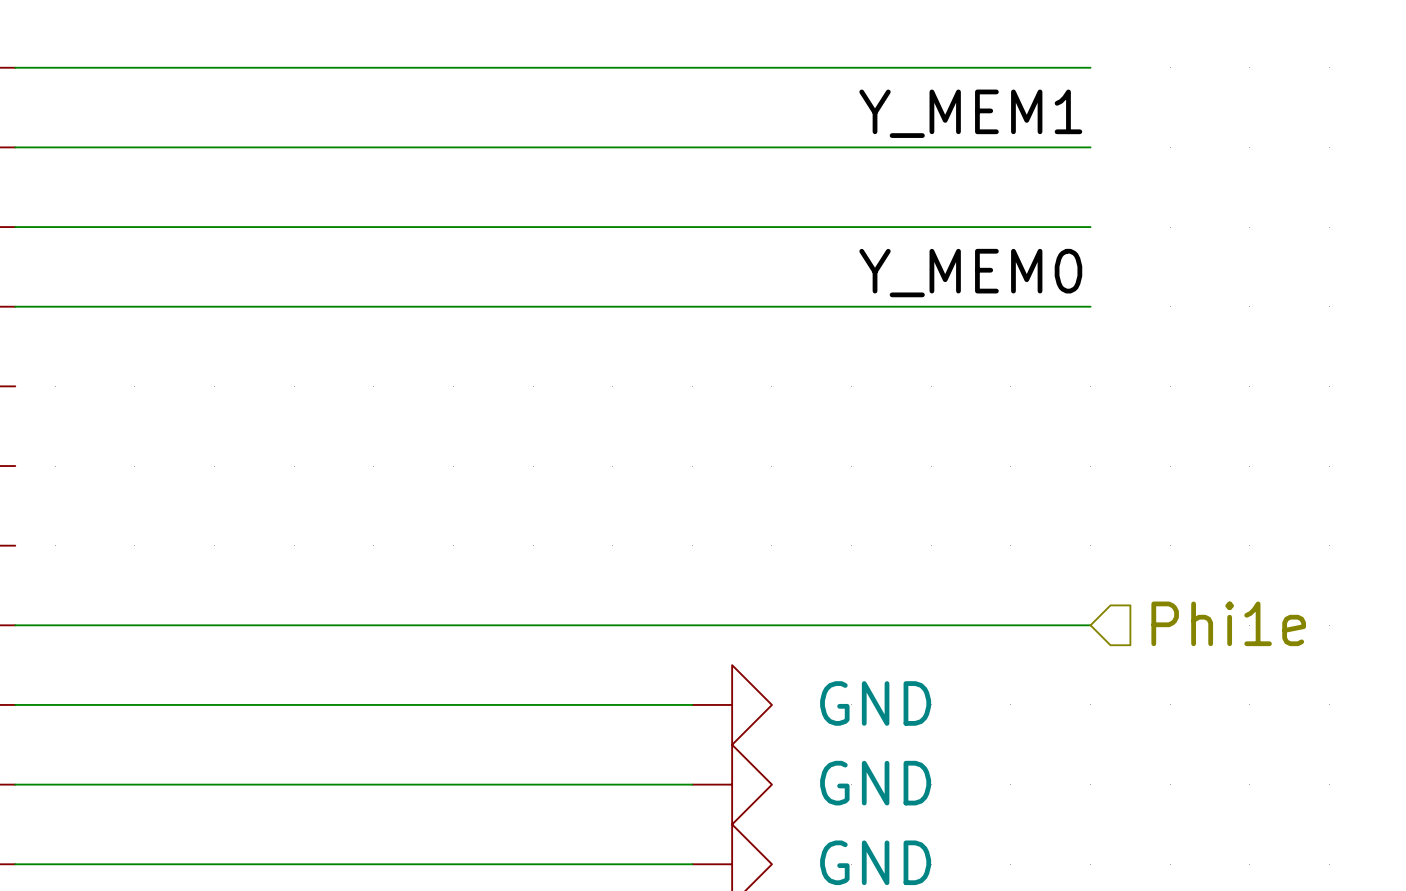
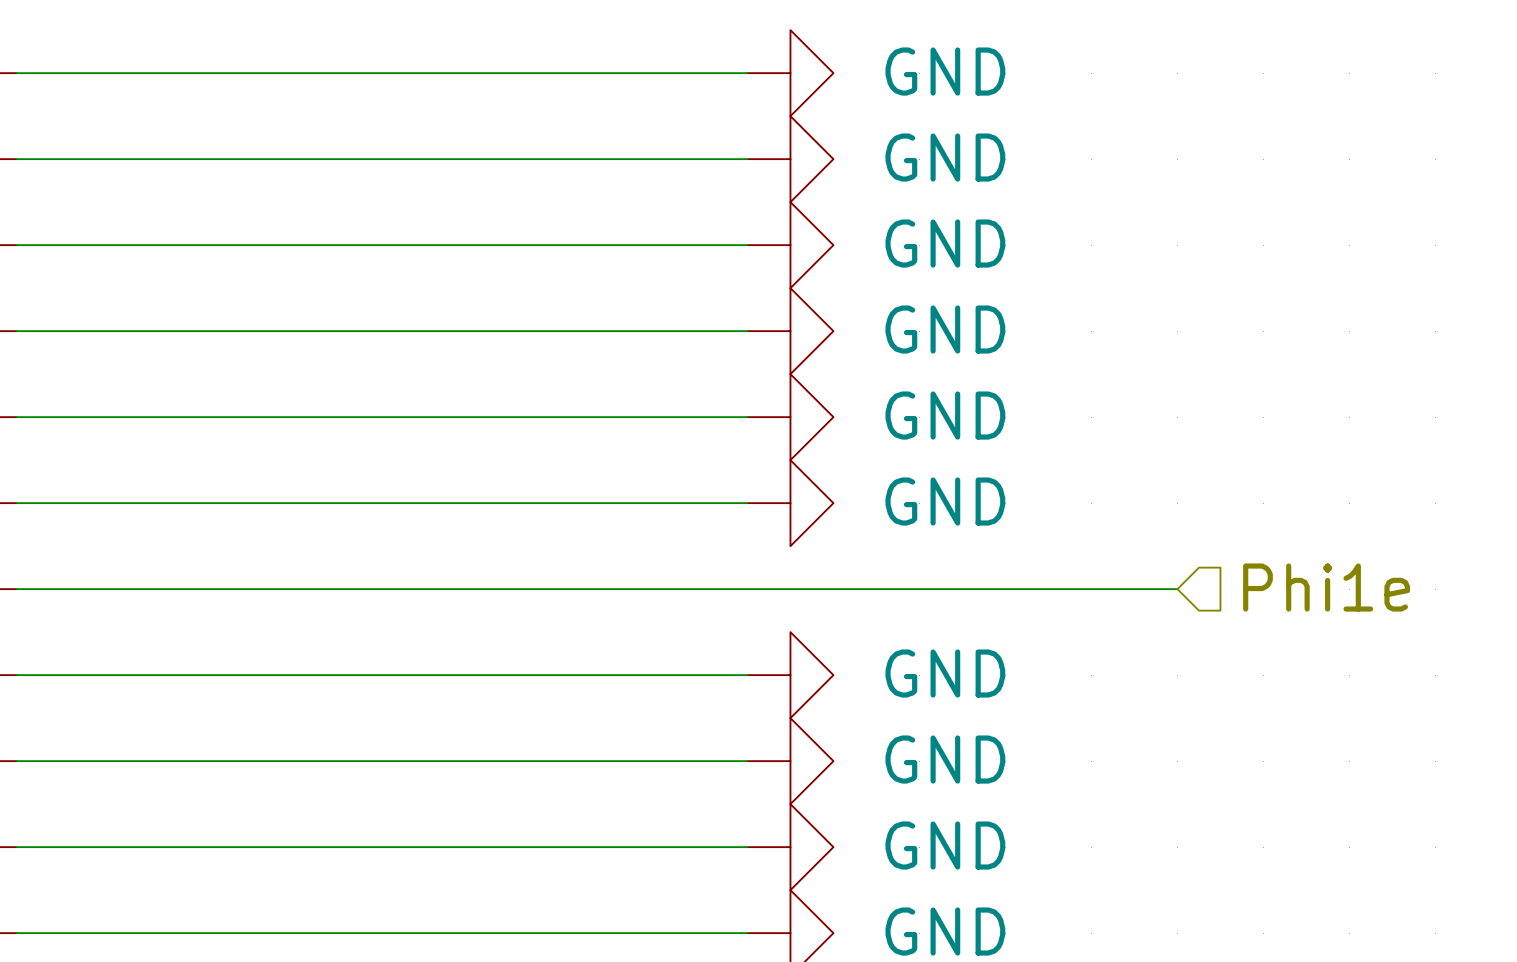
wire: (692, 67) (1090, 67) -> none
power symbol: none -> GND (790, 73)
label: Y_MEM1 (970, 113) -> none
wire: (692, 147) (1090, 147) -> none
power symbol: none -> GND (790, 159)
wire: (692, 227) (1090, 227) -> none
power symbol: none -> GND (790, 245)
label: Y_MEM0 (970, 273) -> none
wire: (692, 306) (1090, 306) -> none
power symbol: none -> GND (790, 331)
wire: none -> (16, 417) (747, 417)
power symbol: none -> GND (790, 417)
wire: none -> (16, 503) (747, 503)
power symbol: none -> GND (790, 503)
wire: none -> (16, 589) (1177, 589)
hierarchical label position: Phi1e (1228, 623) -> Phi1e (1326, 587)
wire: (692, 625) (1090, 625) -> none
power symbol: none -> GND (790, 675)

